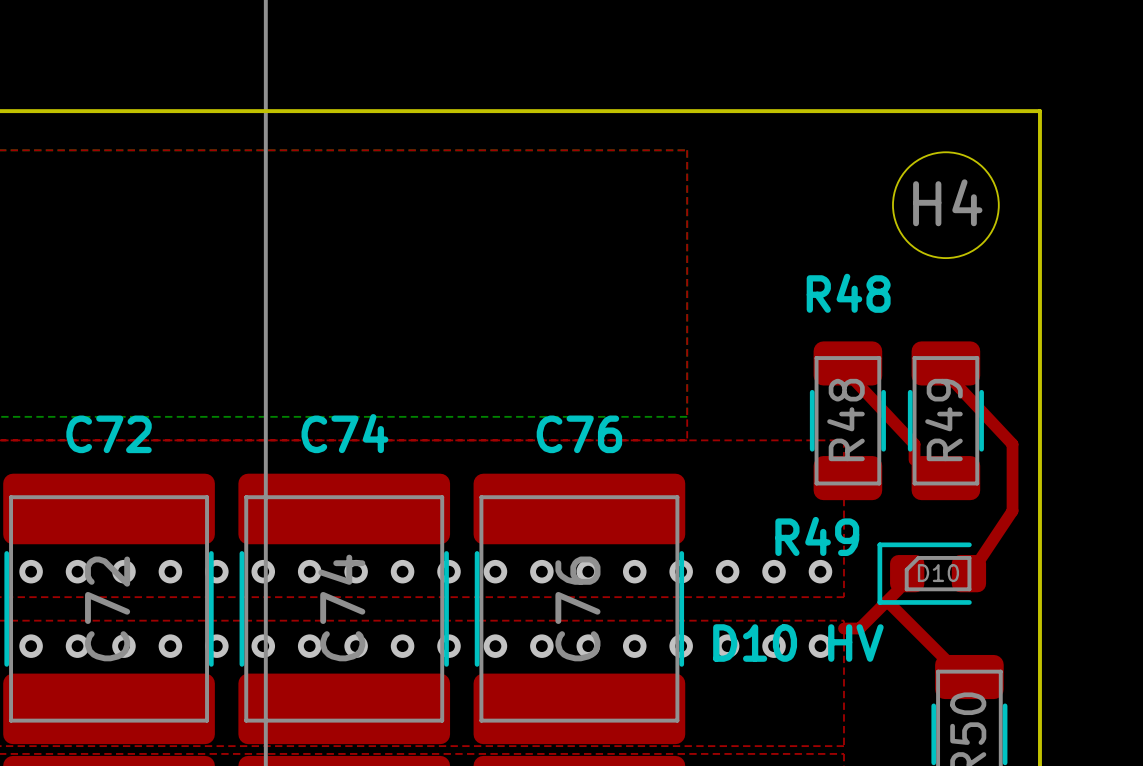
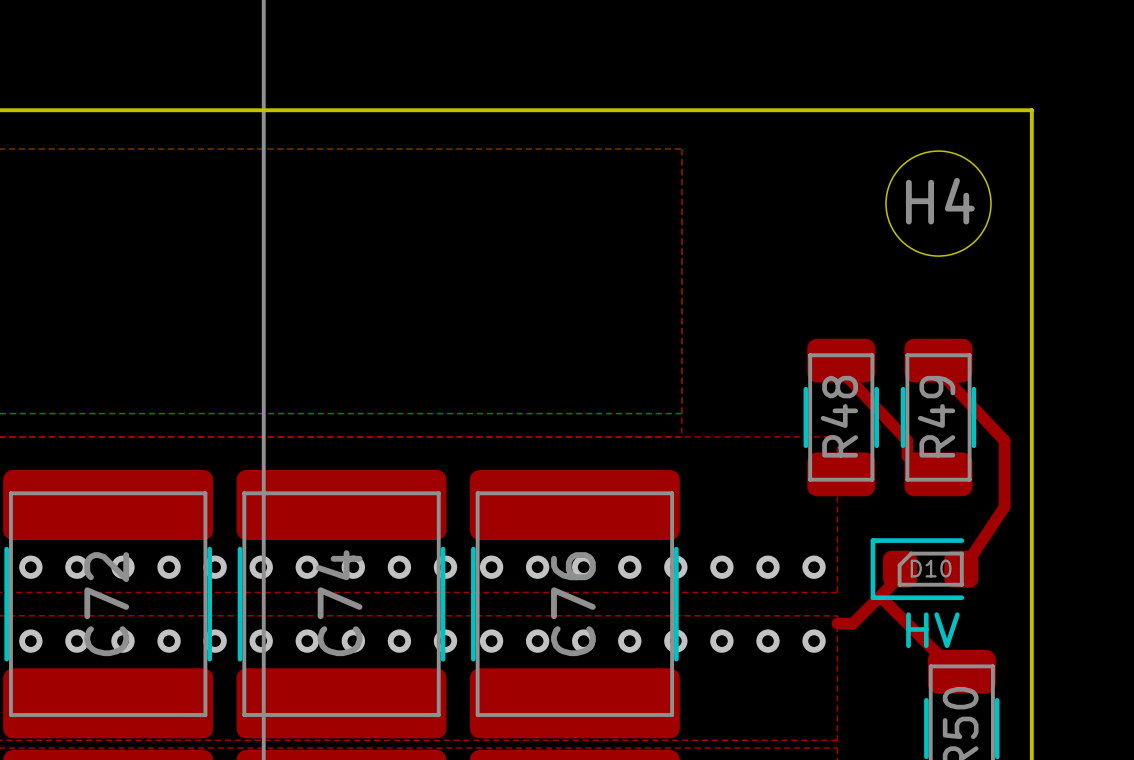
text: R48 (848, 293) -> none
text: C74 (344, 433) -> none
text: C72 (109, 434) -> none
text: C76 (579, 434) -> none
text: R49 (817, 536) -> none
text: none -> HV (932, 630)
text: D10 HV (798, 643) -> none

